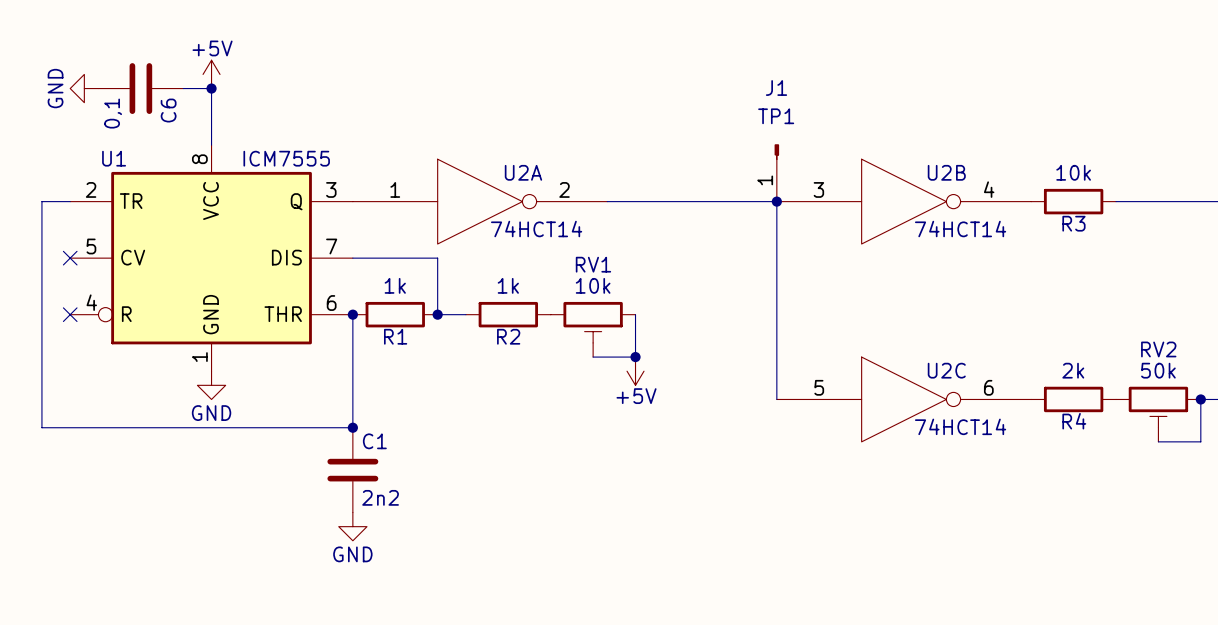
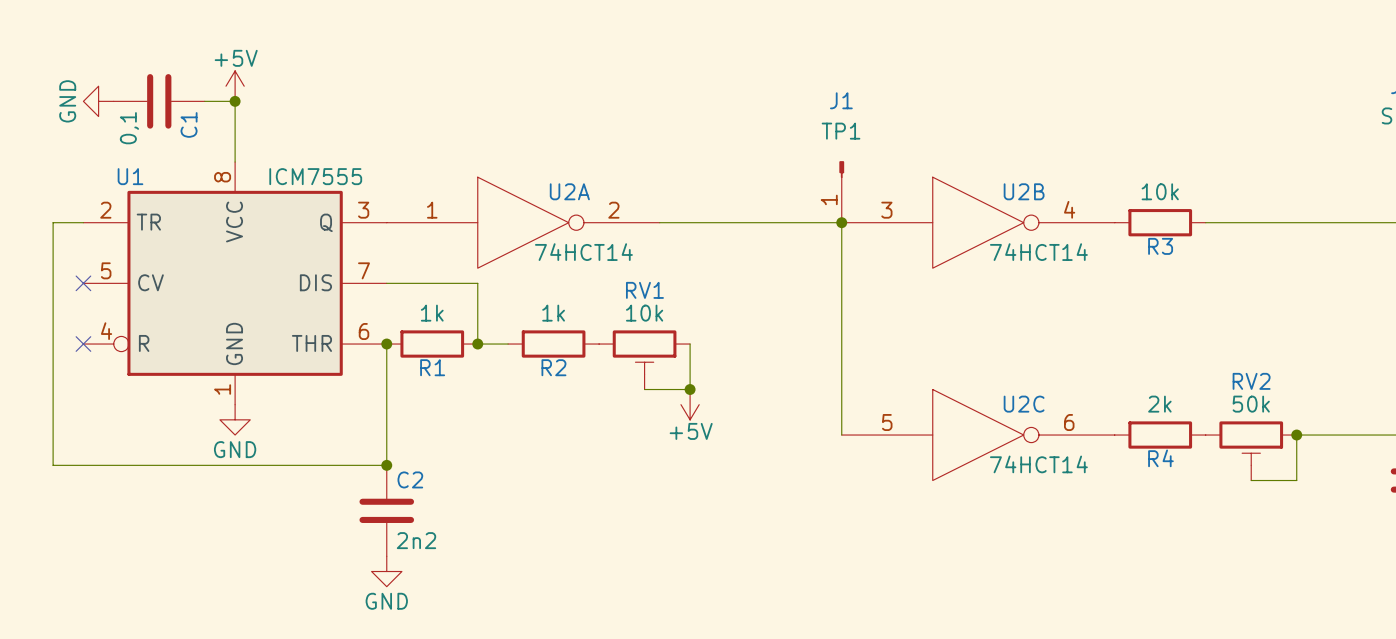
C6 name: C6 (168, 110) -> C1 (189, 124)
C1 name: C1 (374, 441) -> C2 (410, 479)

